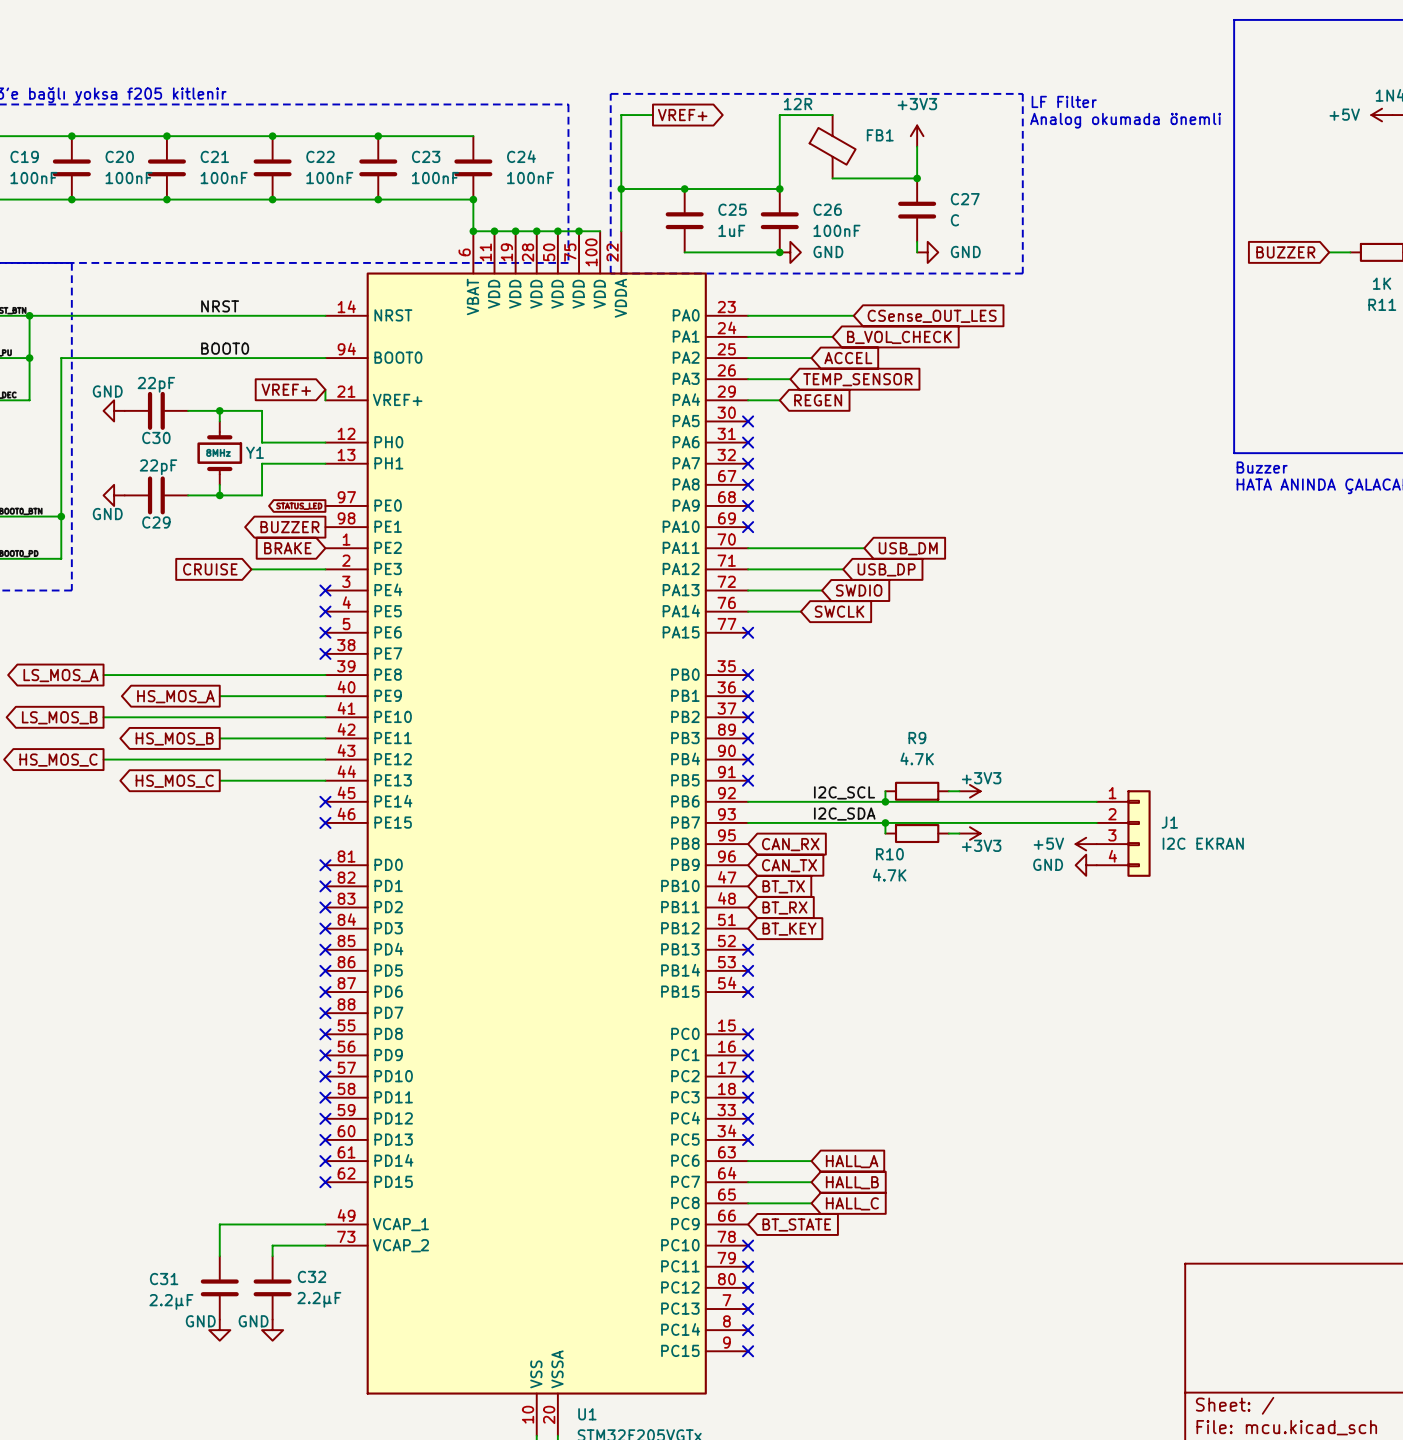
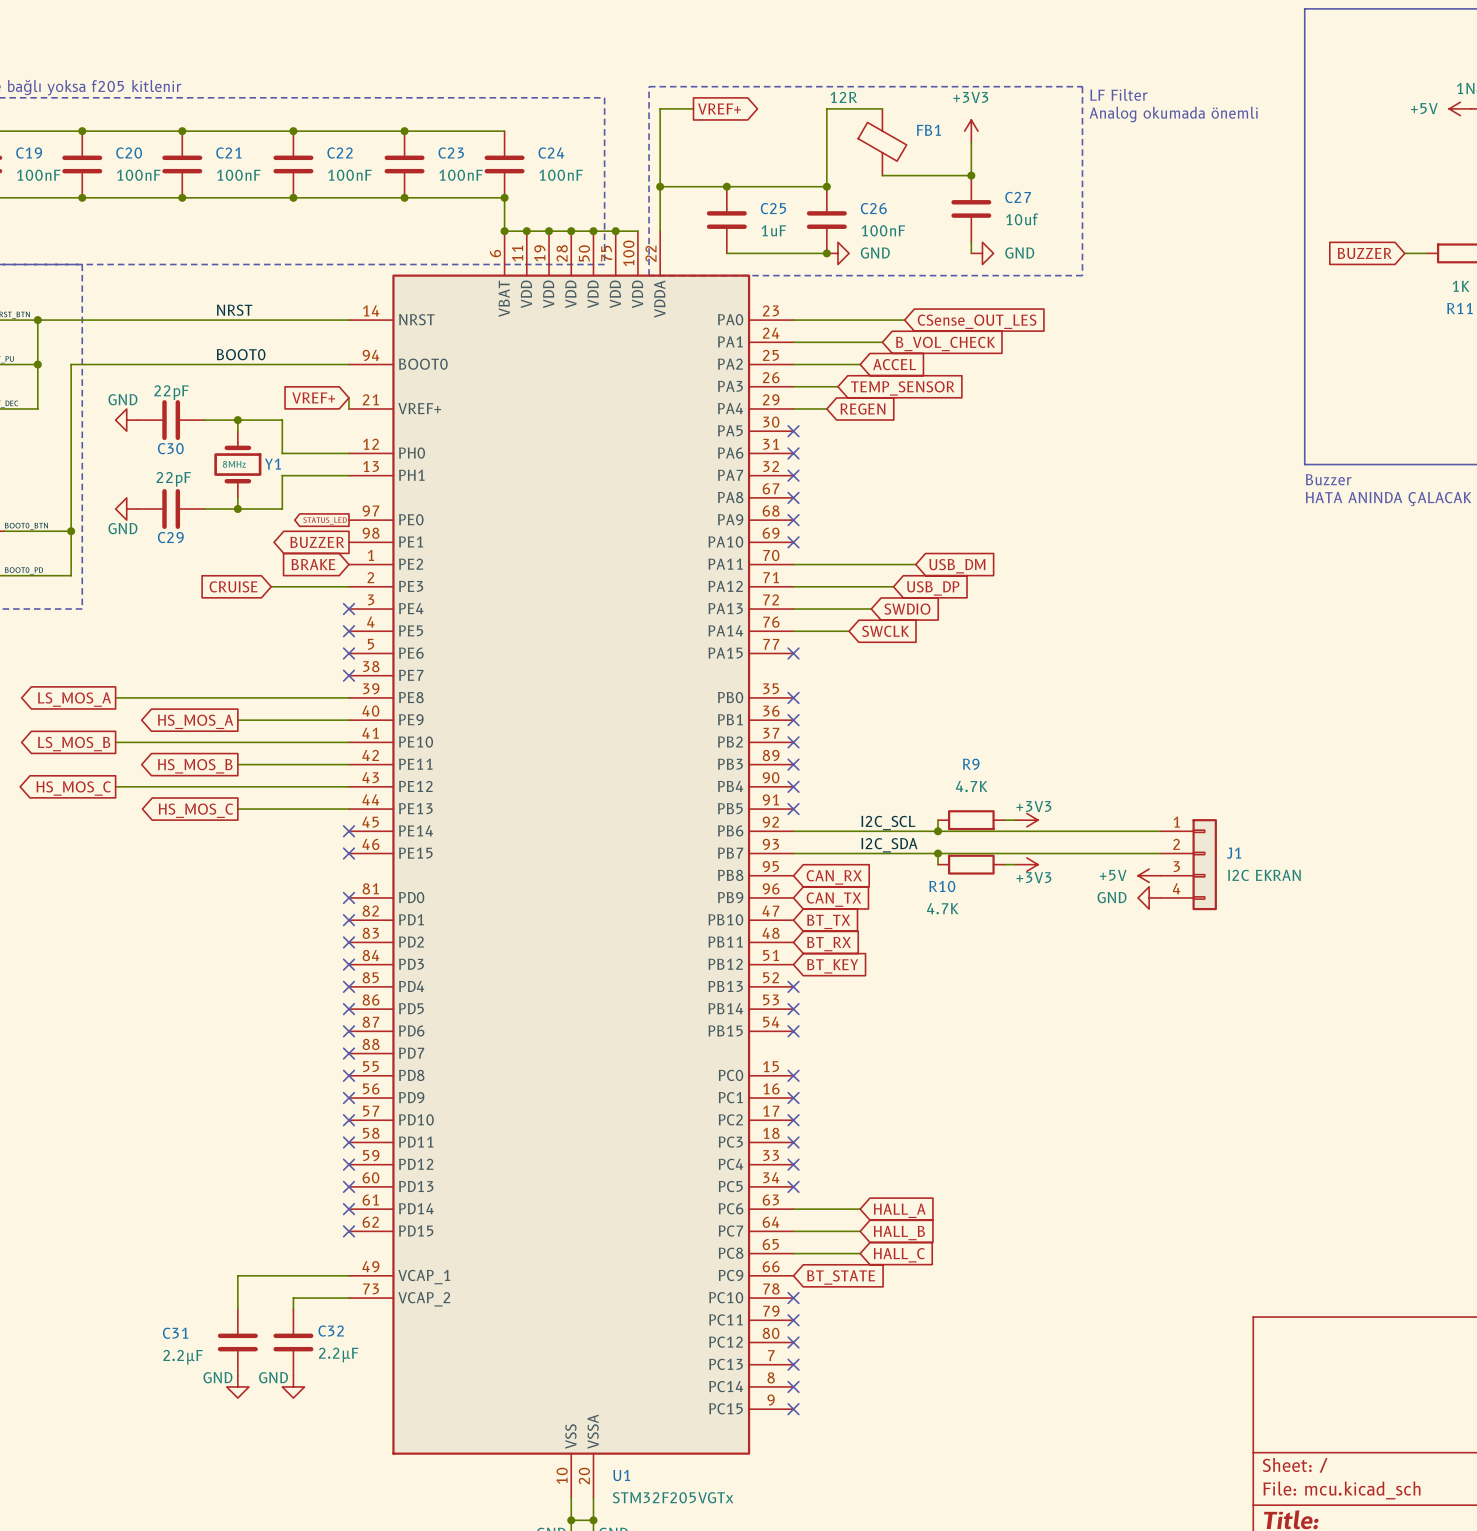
C27 value: C (954, 220) -> 10uf (1022, 219)

